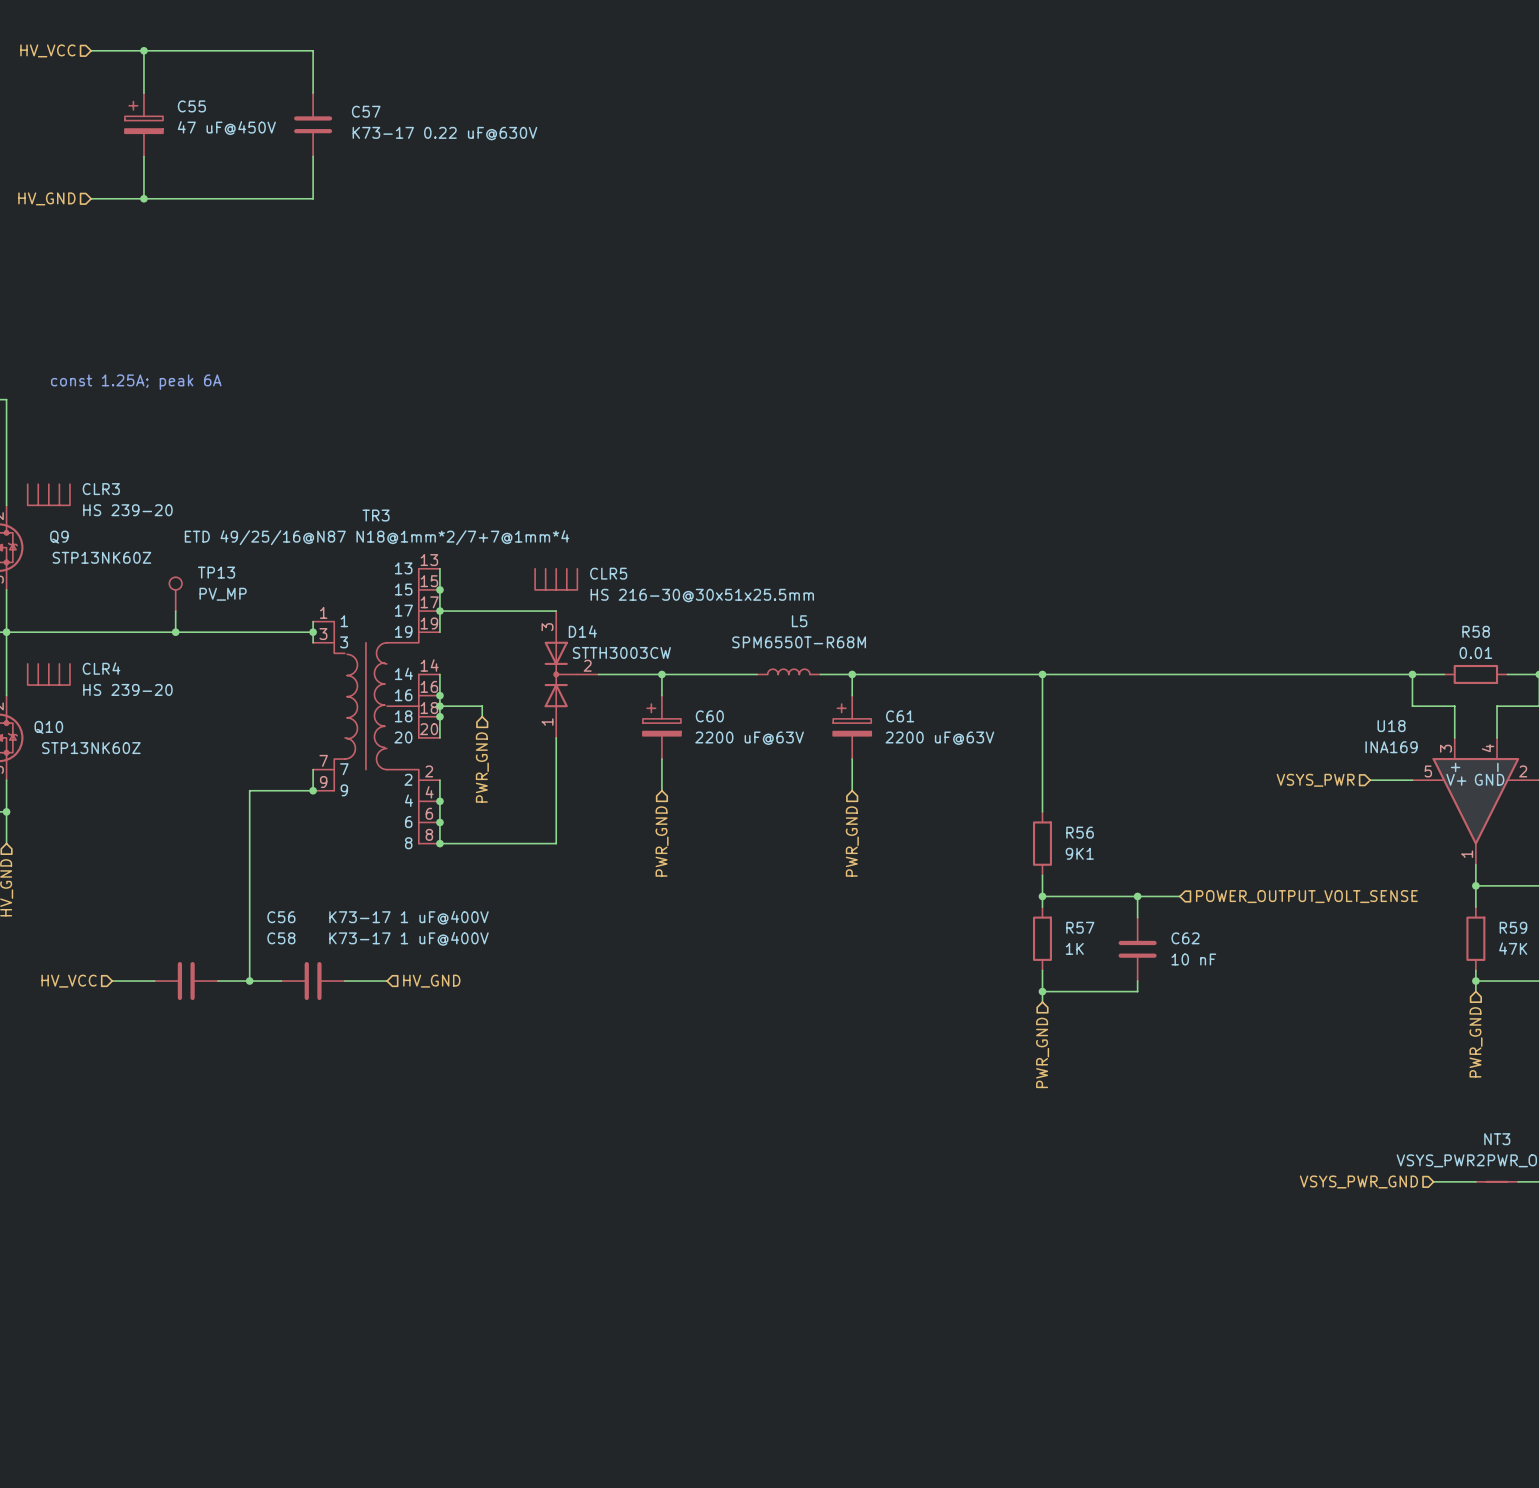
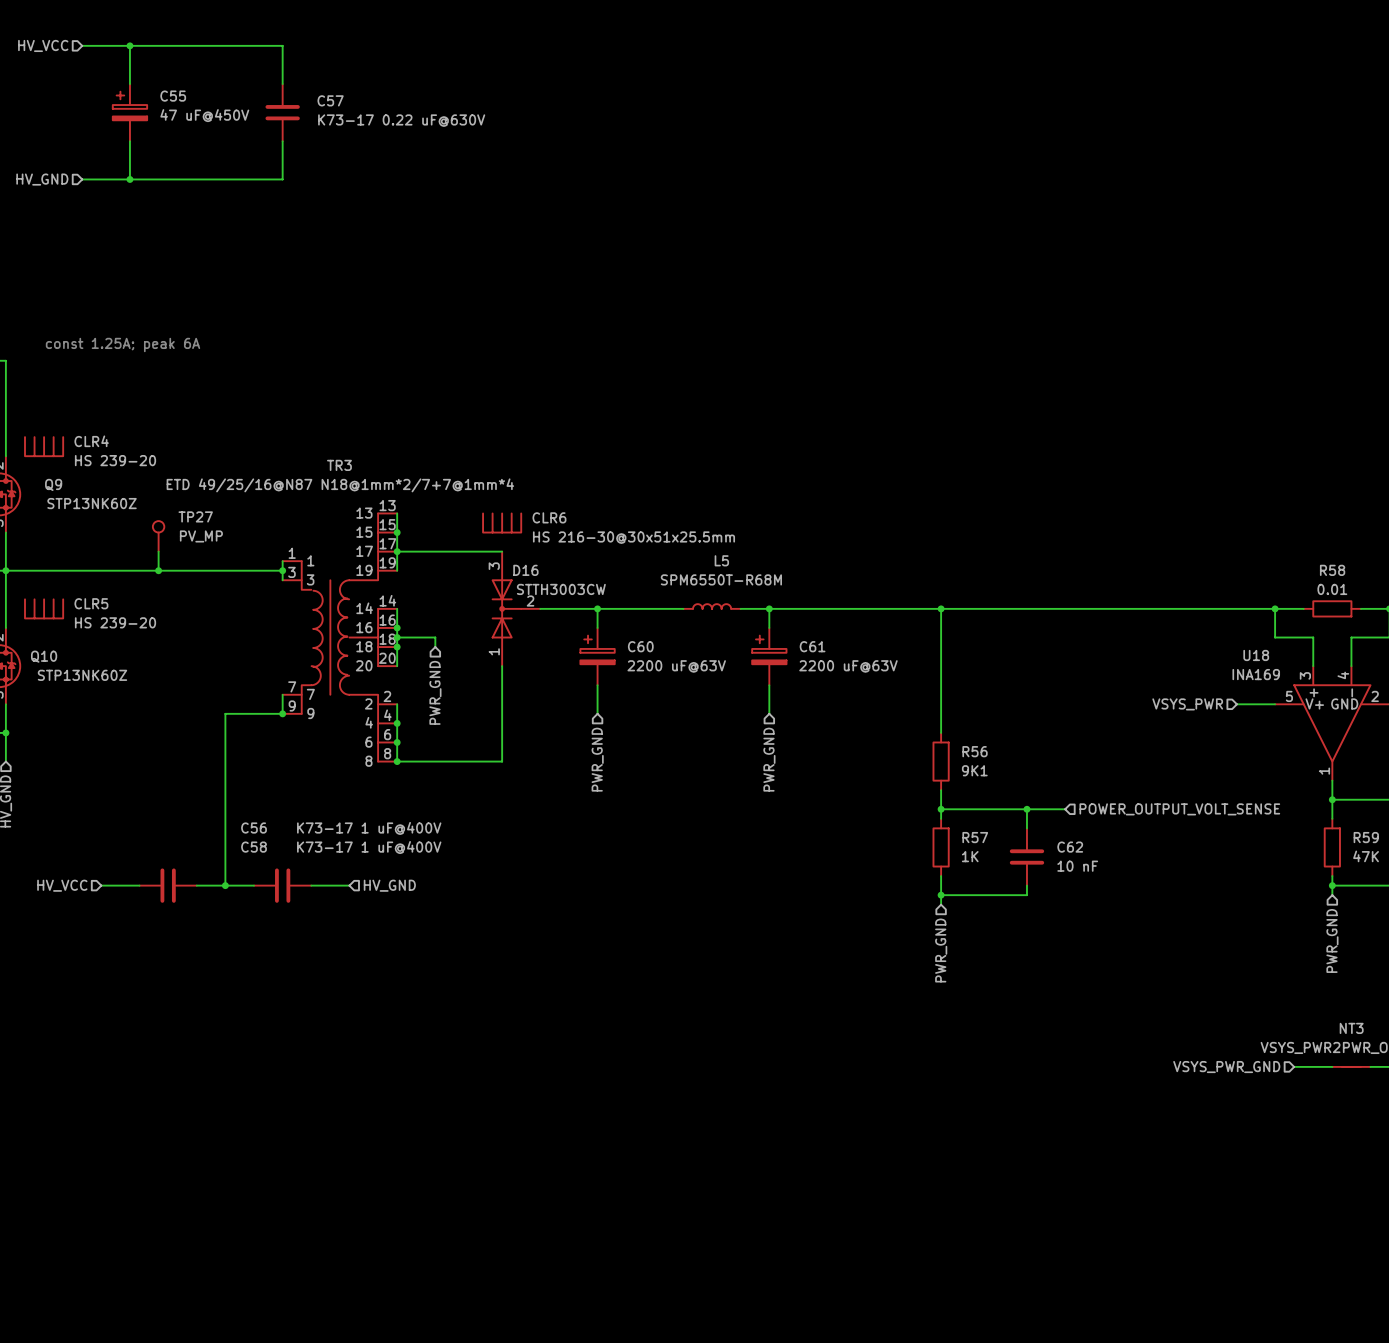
CLR3 name: CLR3 (101, 489) -> CLR4 (91, 441)
TP13 name: TP13 (216, 572) -> TP27 (195, 516)
CLR5 name: CLR5 (608, 573) -> CLR6 (549, 517)
D14 name: D14 (582, 631) -> D16 (525, 570)
CLR4 name: CLR4 (101, 668) -> CLR5 (91, 603)

